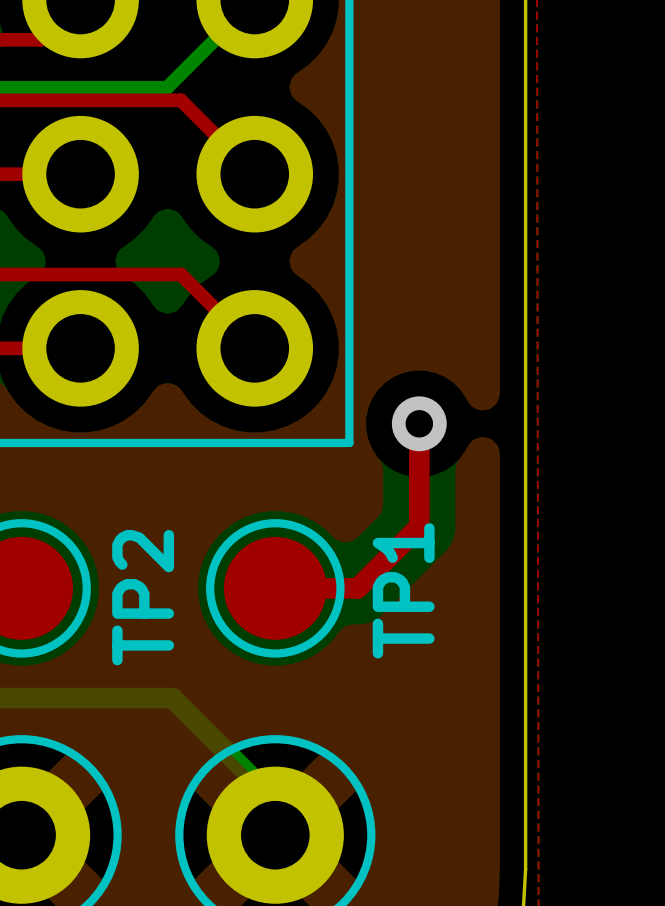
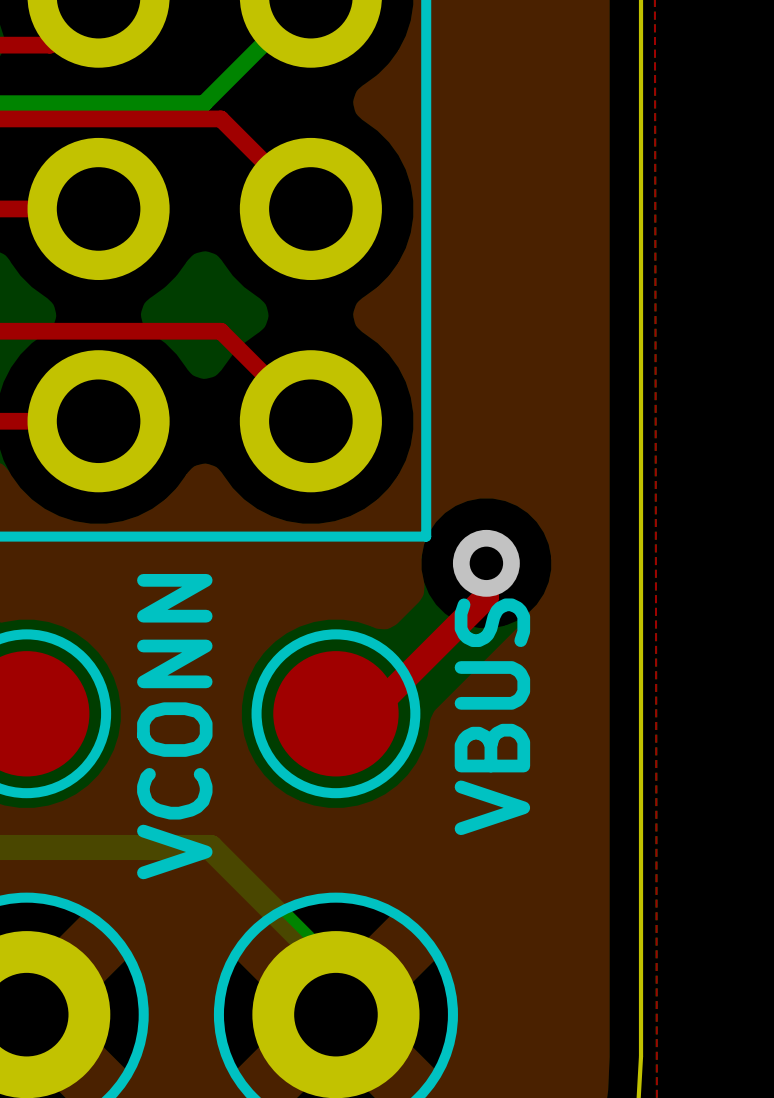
top track: (419, 423) (419, 526) (357, 588) (302, 588) -> (486, 563) (486, 596) (369, 713)
via position: (419, 423) -> (486, 563)
TP1 name: TP1 (403, 590) -> VBUS (492, 716)
TP2 name: TP2 (143, 597) -> VCONN (174, 726)

